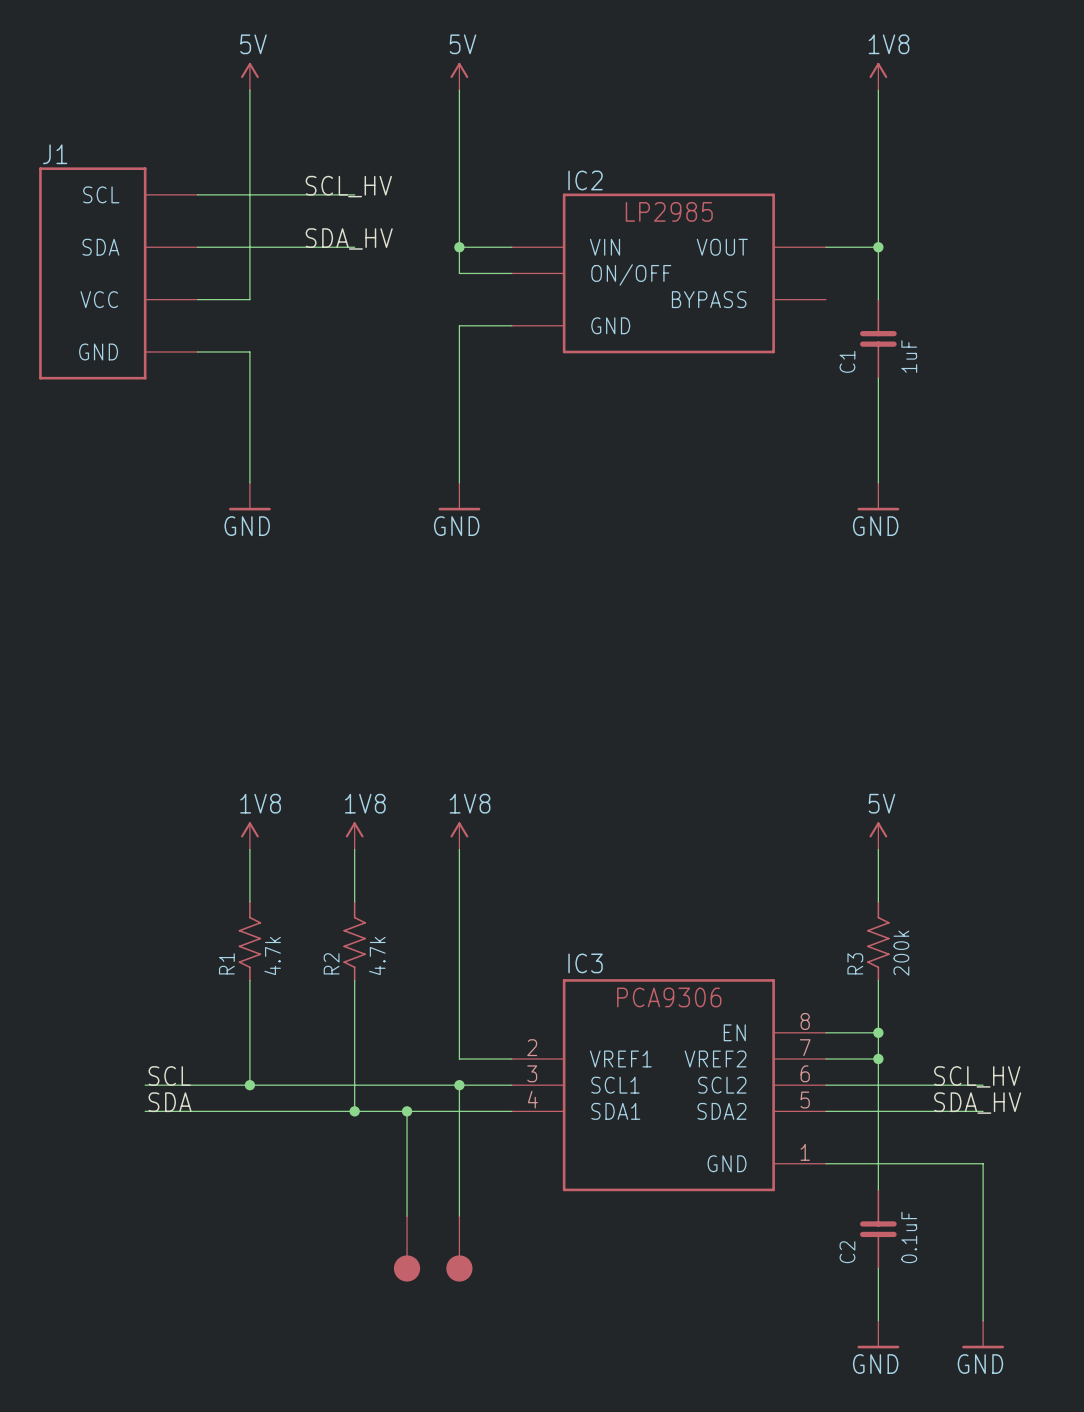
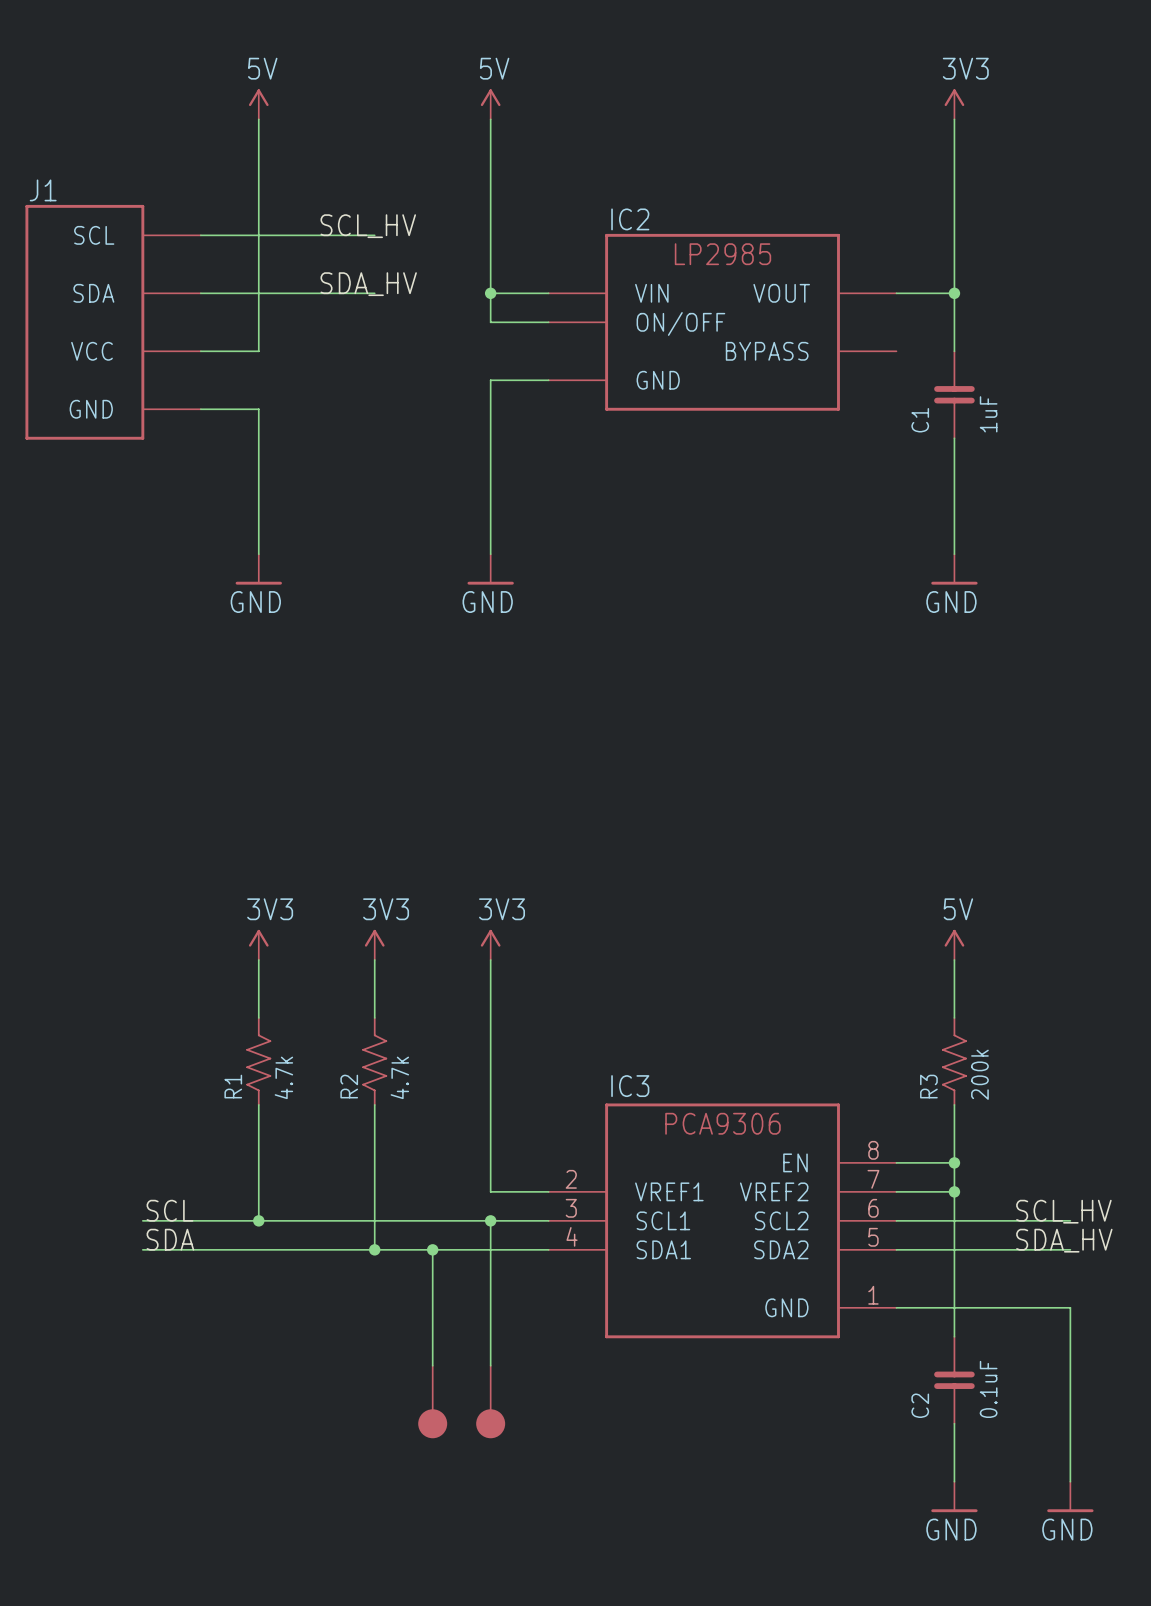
power symbol: 1V8 (878, 76) -> 3V3 (954, 104)
power symbol: 1V8 (249, 835) -> 3V3 (258, 944)
power symbol: 1V8 (354, 835) -> 3V3 (374, 944)
power symbol: 1V8 (459, 835) -> 3V3 (490, 944)

